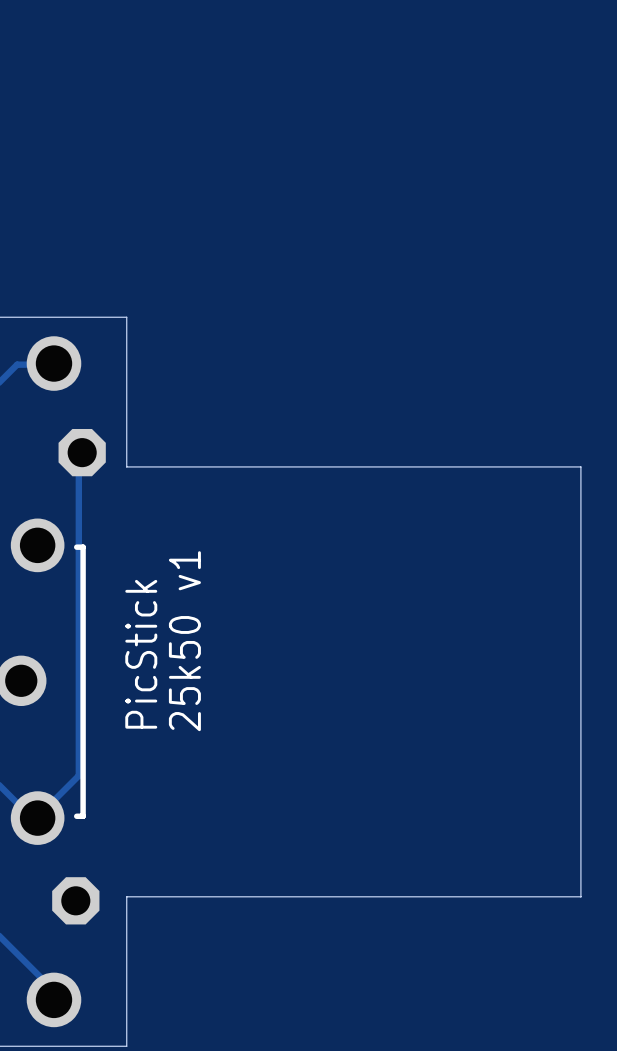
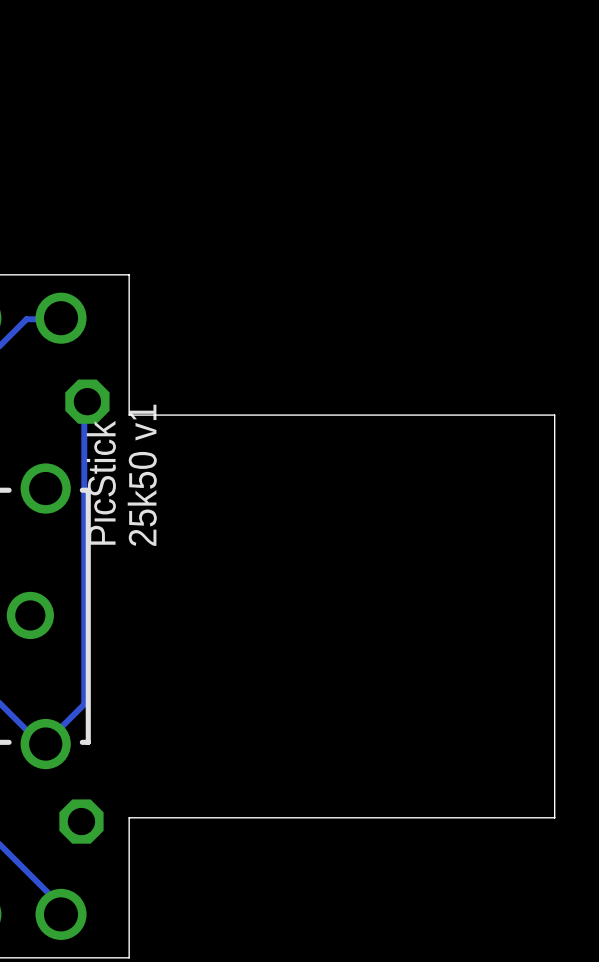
text: none -> PicStick (101, 482)
text: 25k50 v1 (184, 641) -> none
text: PicStick (141, 654) -> 25k50 v1 (142, 475)

